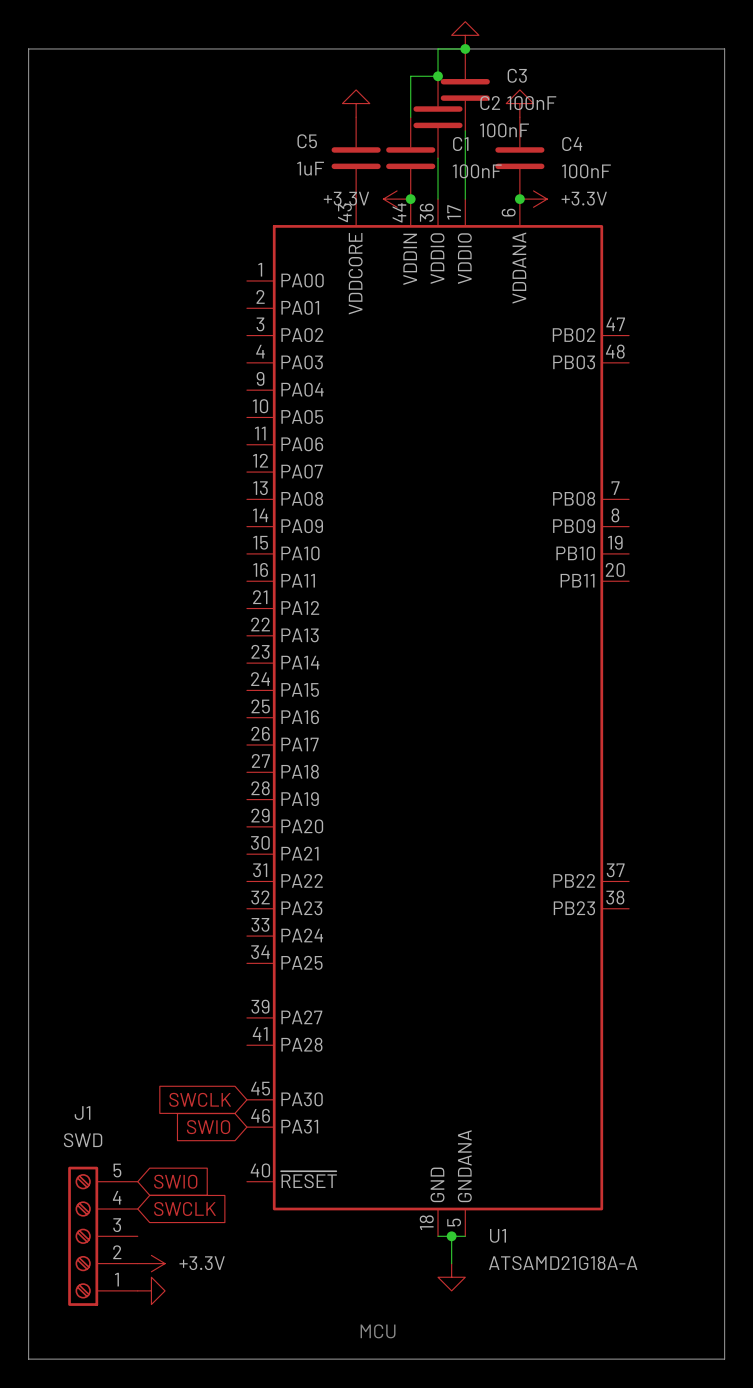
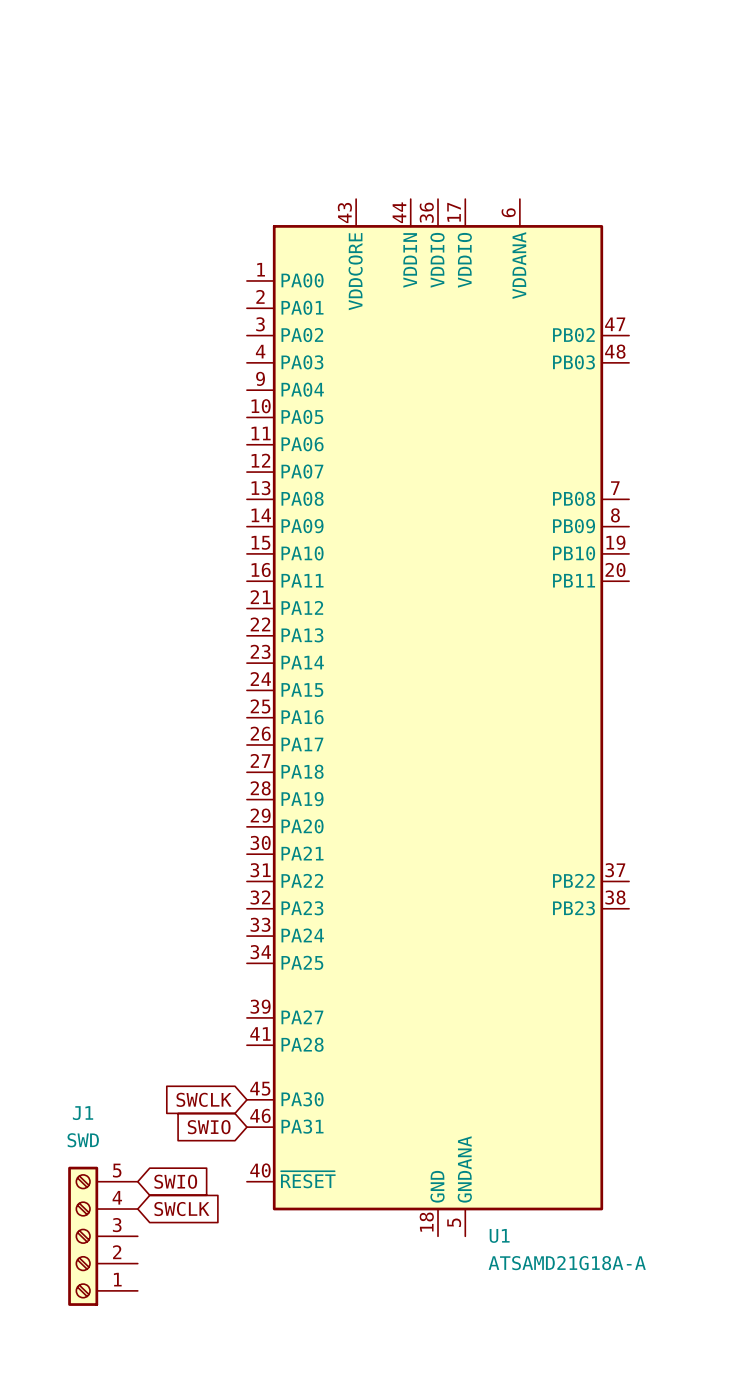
power symbol: (465, 35) -> none
line: (28, 48) (724, 48) (724, 1359) (28, 1359) (28, 48) -> none
wire: (465, 48) (438, 48) (438, 76) (410, 76) (410, 117) -> none
junction: (465, 48) -> none
junction: (438, 76) -> none
C3: 100nF (465, 89) -> none
power symbol: (356, 103) -> none
power symbol: (519, 103) -> none
C2: 100nF (438, 117) -> none
wire: (465, 130) (465, 199) -> none
C5: 1uF (356, 158) -> none
C1: 100nF (410, 158) -> none
wire: (438, 158) (438, 199) -> none
C4: 100nF (519, 158) -> none
power symbol: +3.3V (397, 199) -> none
junction: (410, 199) -> none
junction: (519, 199) -> none
power symbol: +3.3V (533, 199) -> none
wire: (438, 1236) (465, 1236) -> none
wire: (451, 1236) (451, 1263) -> none
junction: (451, 1236) -> none
power symbol: +3.3V (151, 1263) -> none
power symbol: (451, 1277) -> none
power symbol: (151, 1290) -> none
text: MCU (378, 1331) -> none

